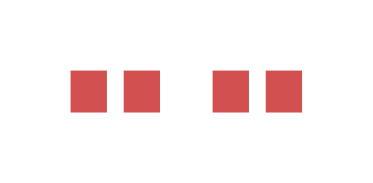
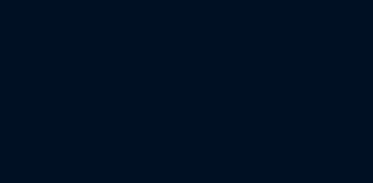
part: (115, 91) -> none
part: (257, 91) -> none

